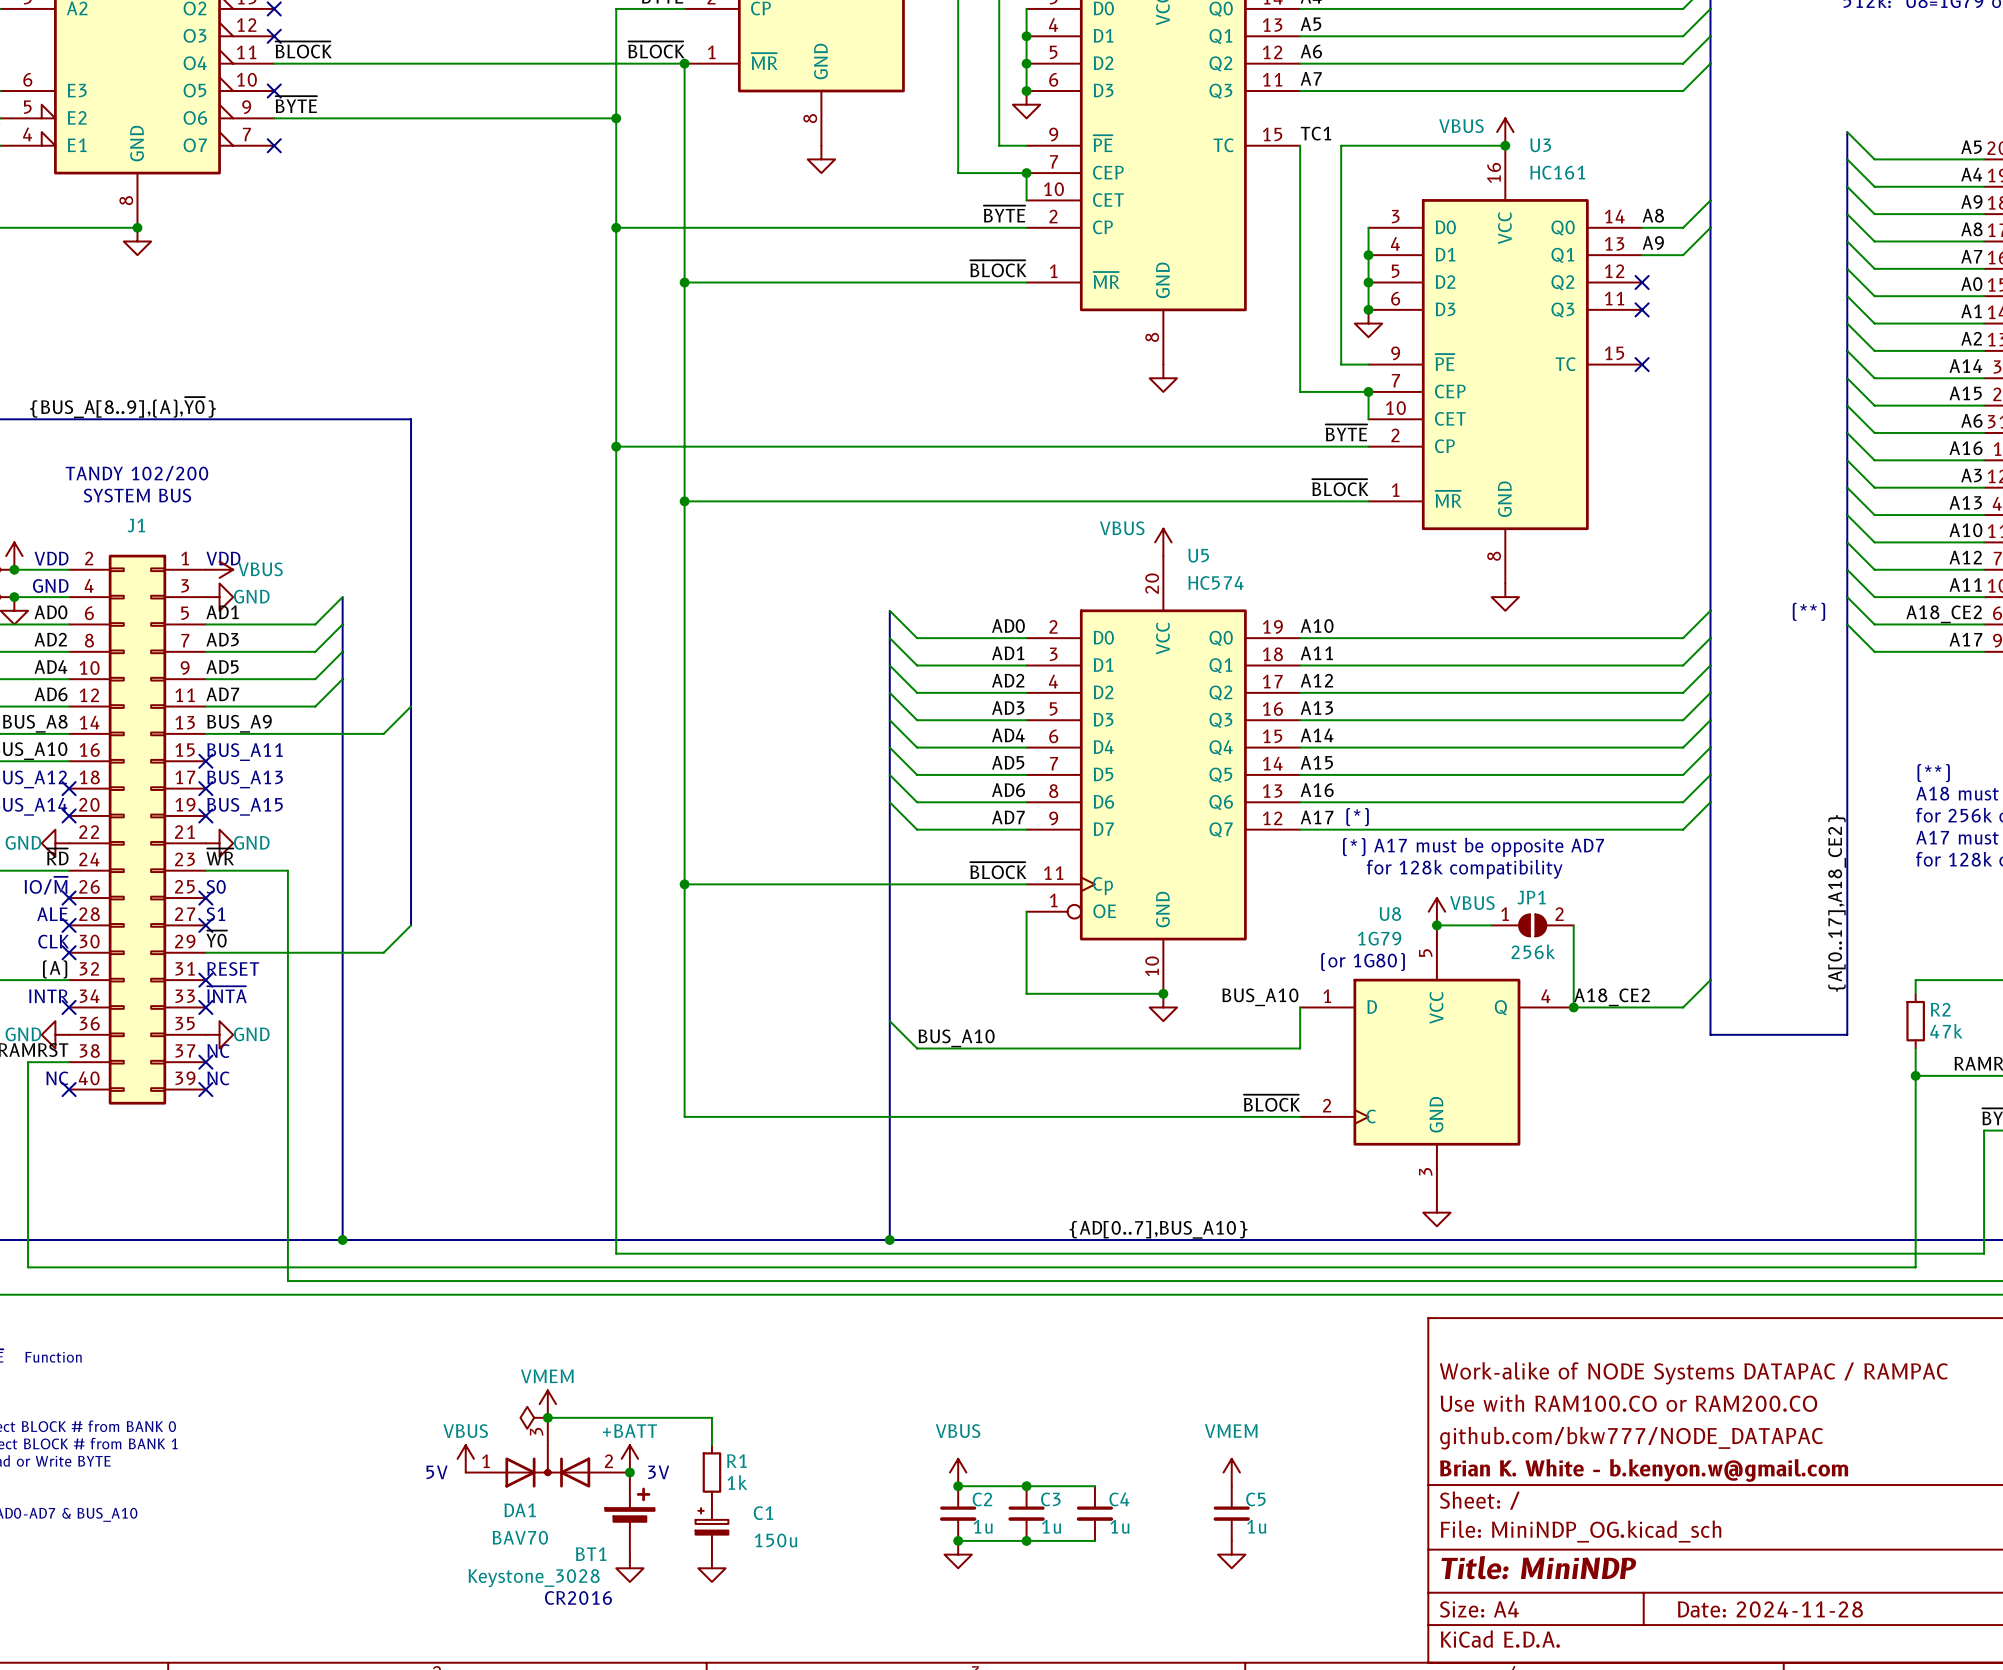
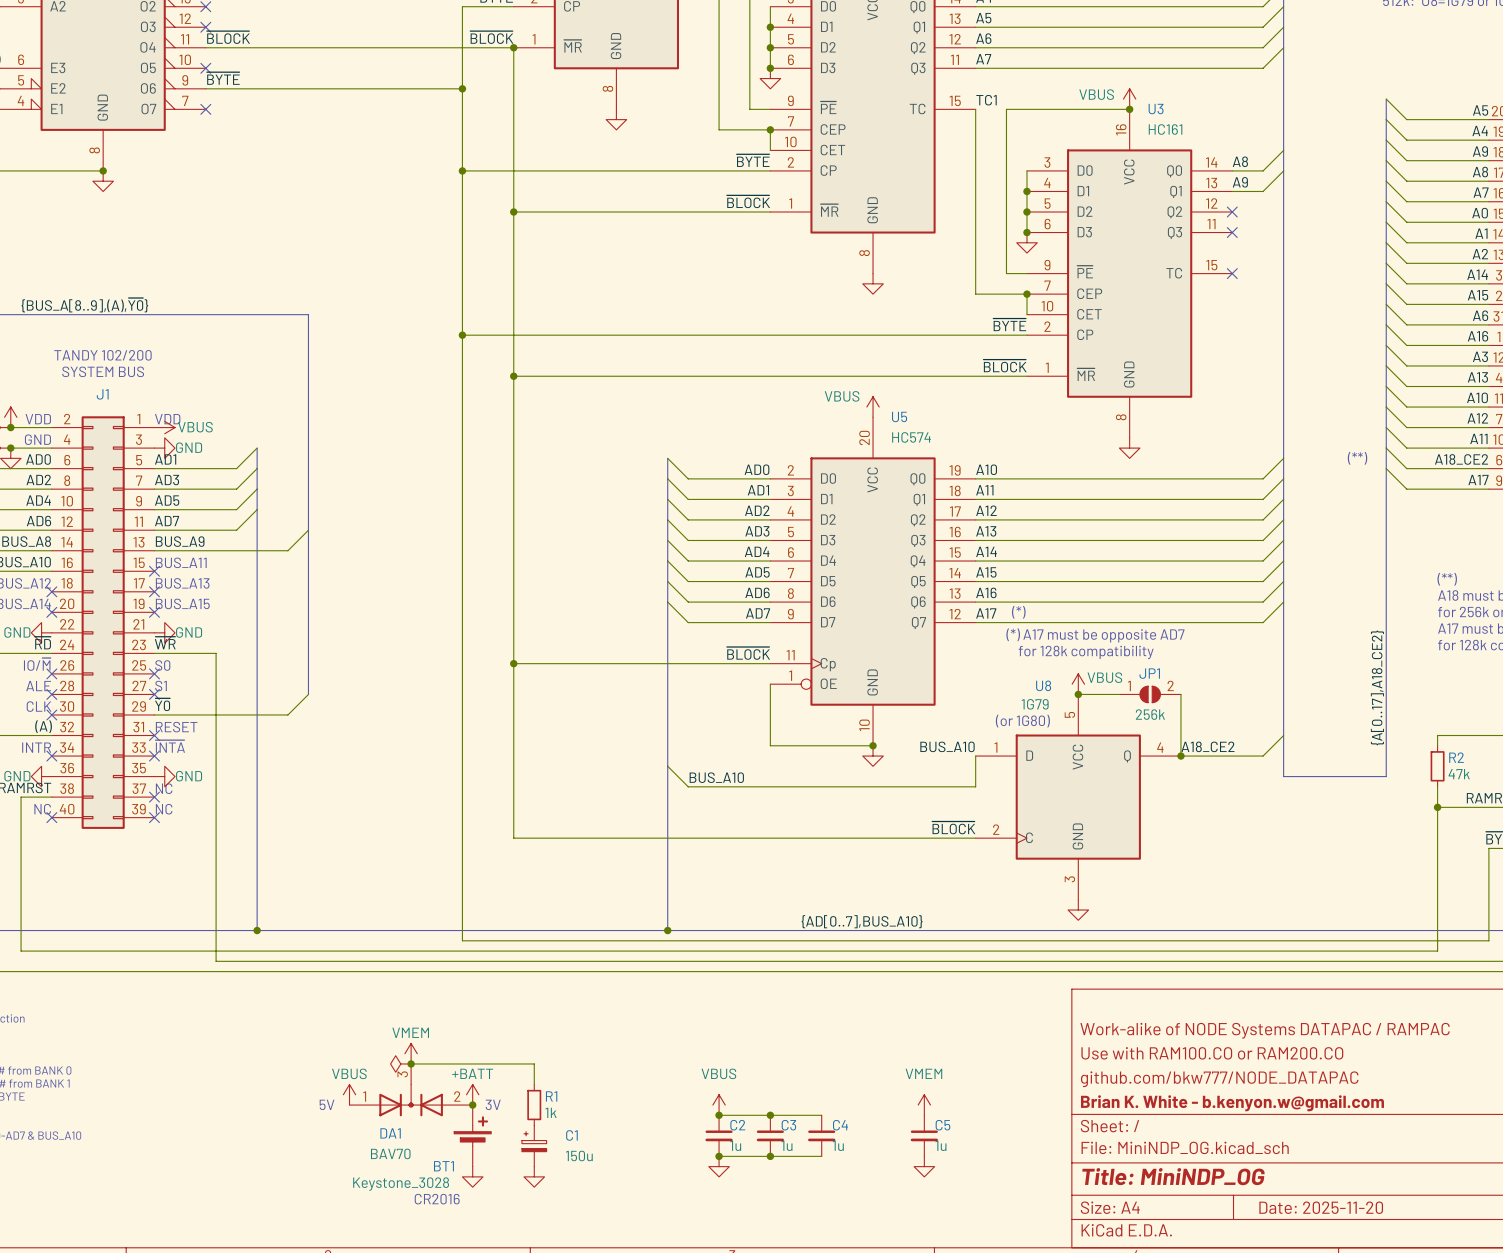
title block: Title: MiniNDP (1538, 1567) -> Title: MiniNDP_OG (1173, 1176)
title block: Date: 2024-11-28 (1770, 1609) -> Date: 2025-11-20 (1321, 1207)

